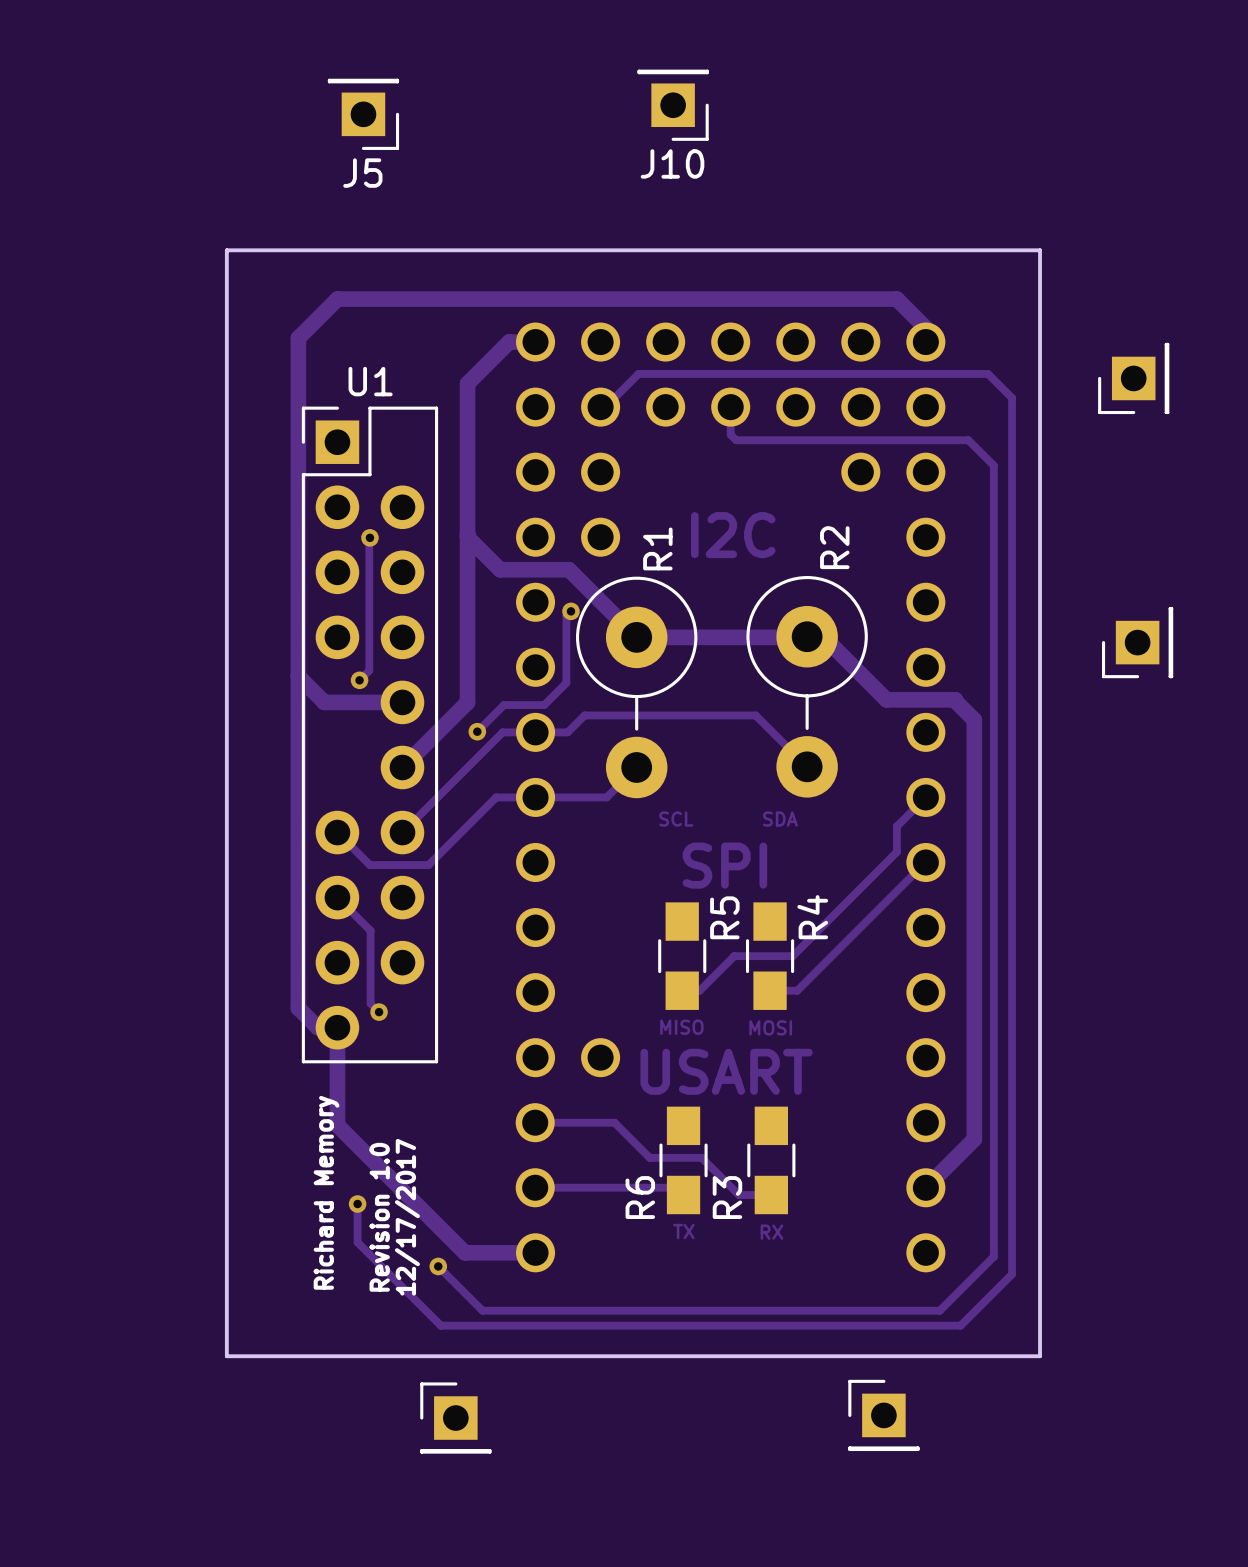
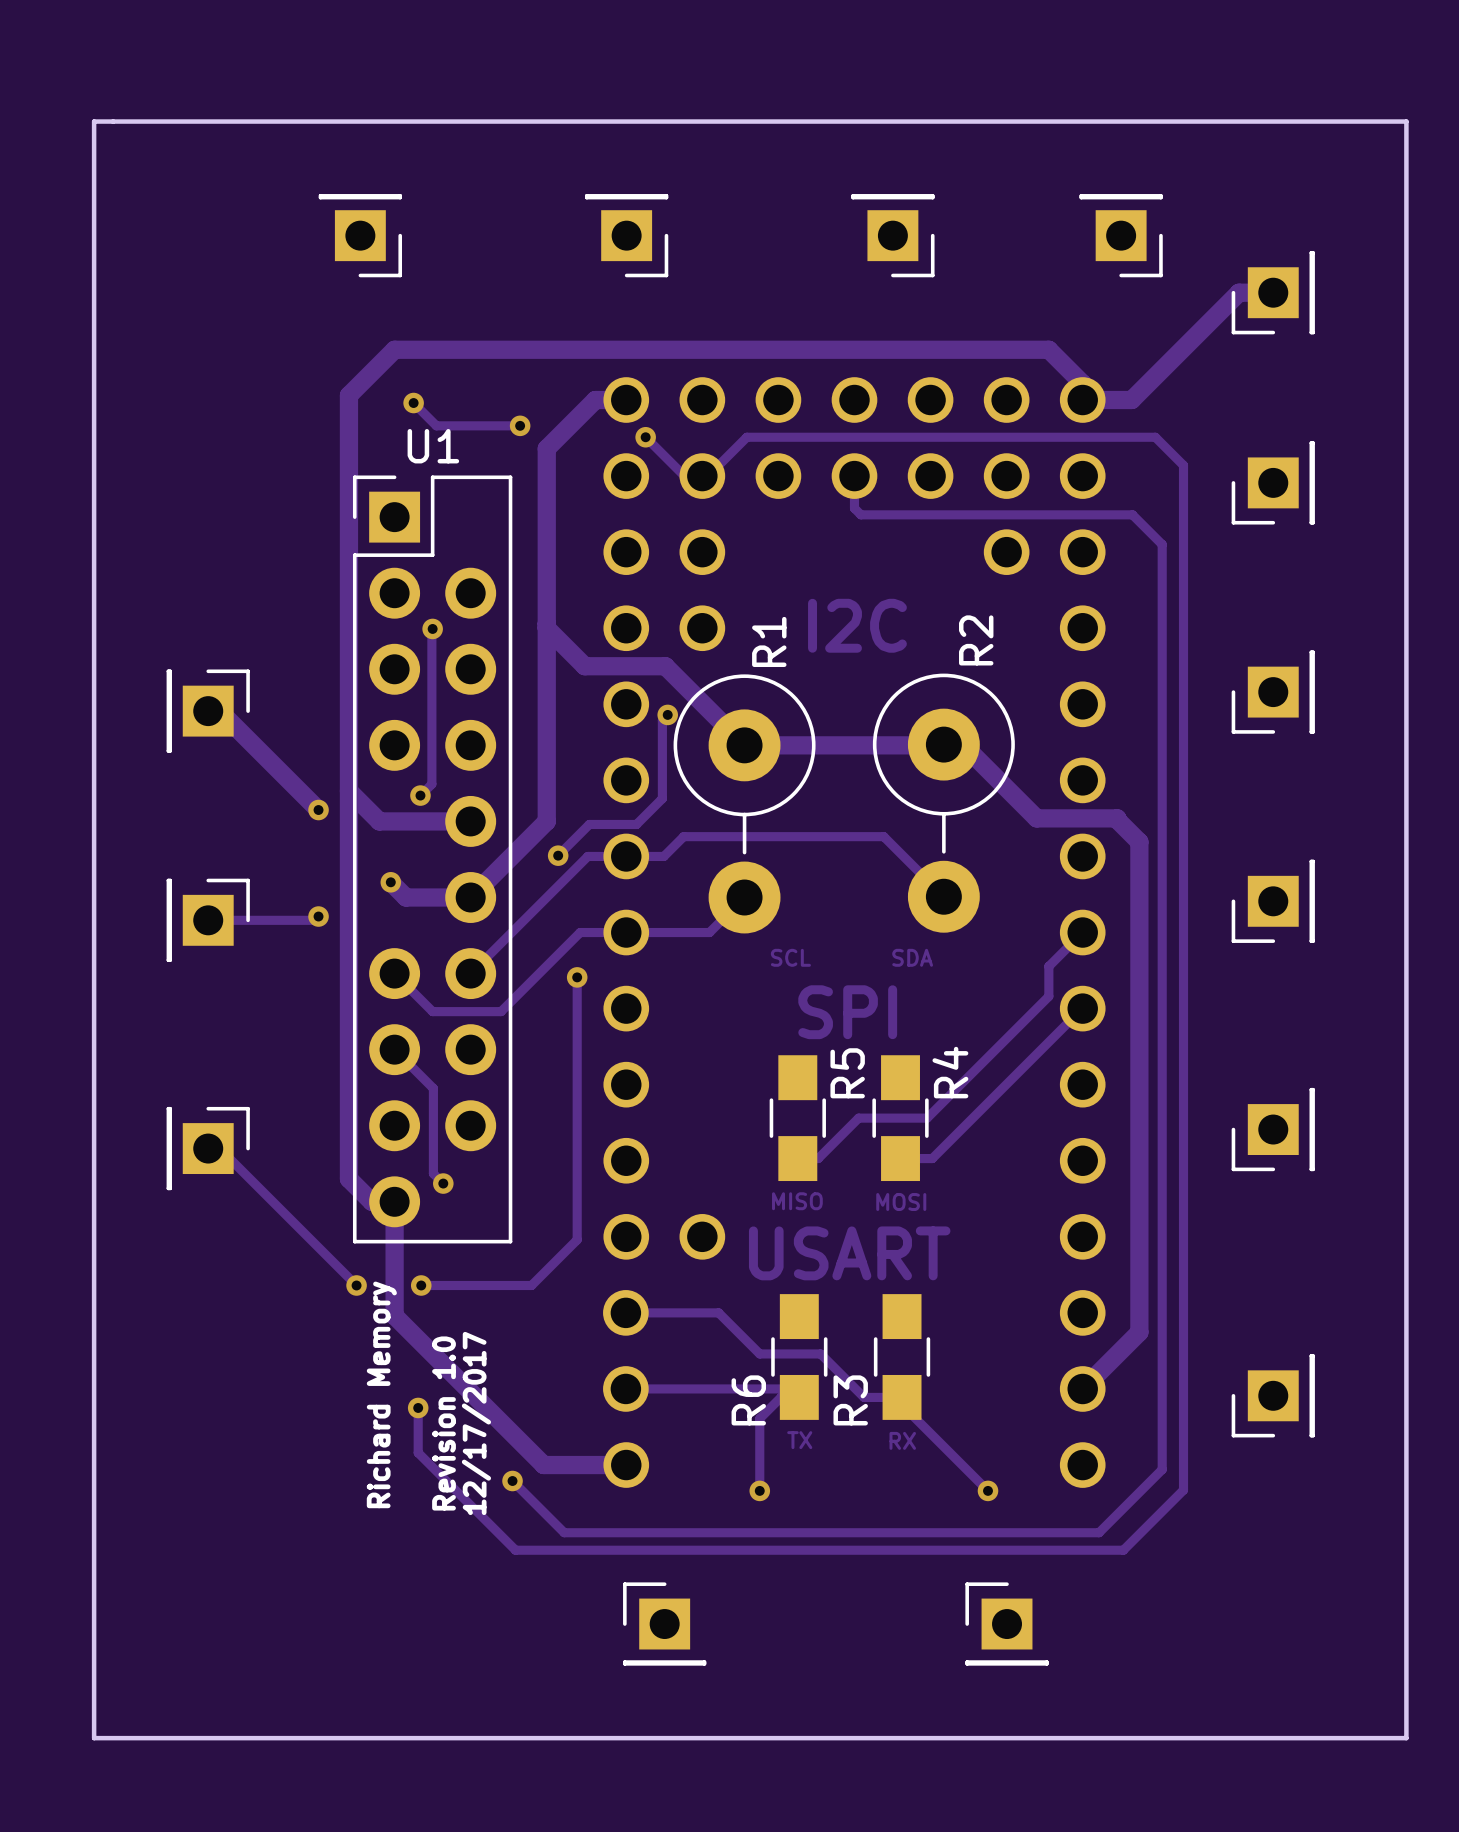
J10: (673, 105) -> none
J5: (363, 114) -> none
part: none -> (360, 235)
part: none -> (626, 235)
part: none -> (892, 235)
part: none -> (1121, 235)
board edge: (226, 250) (226, 1356) (1040, 1356) (1040, 250) (226, 250) -> (94, 121) (94, 1738) (1406, 1738) (1406, 121) (94, 121)
track: none -> (1273, 292) (1239, 292) (1131, 400) (1082, 400)
part: none -> (1273, 292)
track: none -> (413, 403) (436, 425) (520, 425)
via: none -> (413, 403)
via: none -> (520, 425)
track: none -> (645, 437) (684, 476) (702, 476)
via: none -> (645, 437)
part position: (1133, 378) -> (1273, 482)
part: none -> (1273, 692)
track: none -> (208, 711) (219, 711) (318, 810)
part: none -> (208, 711)
part: (1137, 642) -> none
via: none -> (318, 810)
track: none -> (390, 882) (406, 897) (470, 897)
via: none -> (390, 882)
part: none -> (1273, 901)
track: none -> (318, 916) (314, 920) (208, 920)
via: none -> (318, 916)
part: none -> (208, 920)
track: none -> (577, 977) (577, 1239) (531, 1285) (421, 1285)
via: none -> (577, 977)
part: none -> (1273, 1129)
track: none -> (208, 1148) (219, 1148) (356, 1285)
part: none -> (208, 1148)
via: none -> (356, 1285)
via: none -> (421, 1285)
part: none -> (1273, 1395)
track: none -> (799, 1397) (780, 1397) (759, 1418) (759, 1490)
track: none -> (902, 1397) (902, 1404) (987, 1490)
via: none -> (759, 1490)
via: none -> (987, 1490)
part position: (883, 1415) -> (1007, 1624)
part position: (455, 1418) -> (664, 1624)

